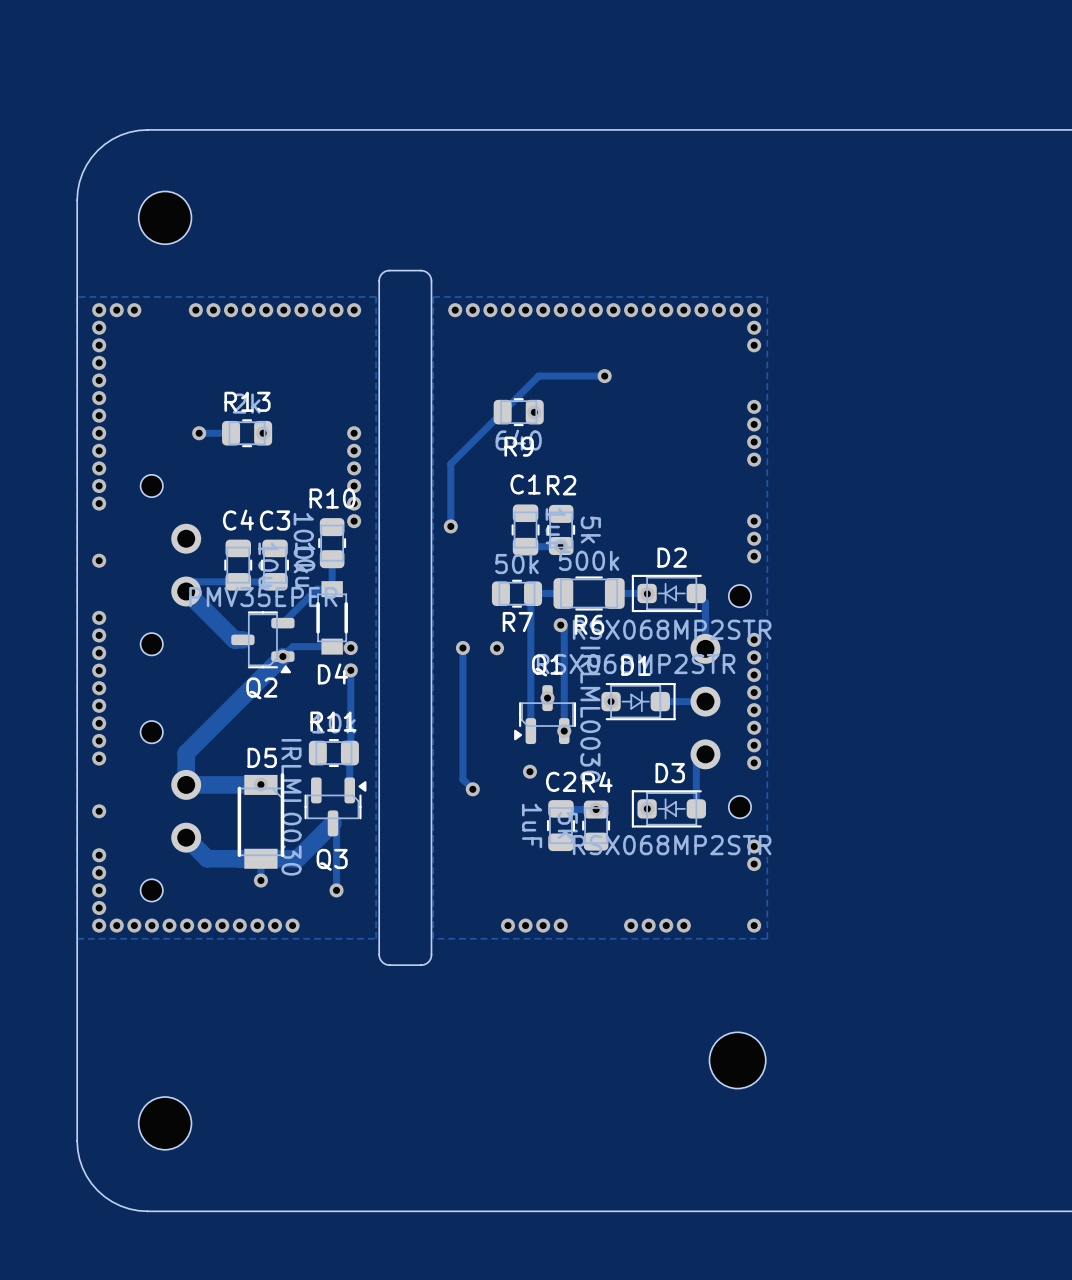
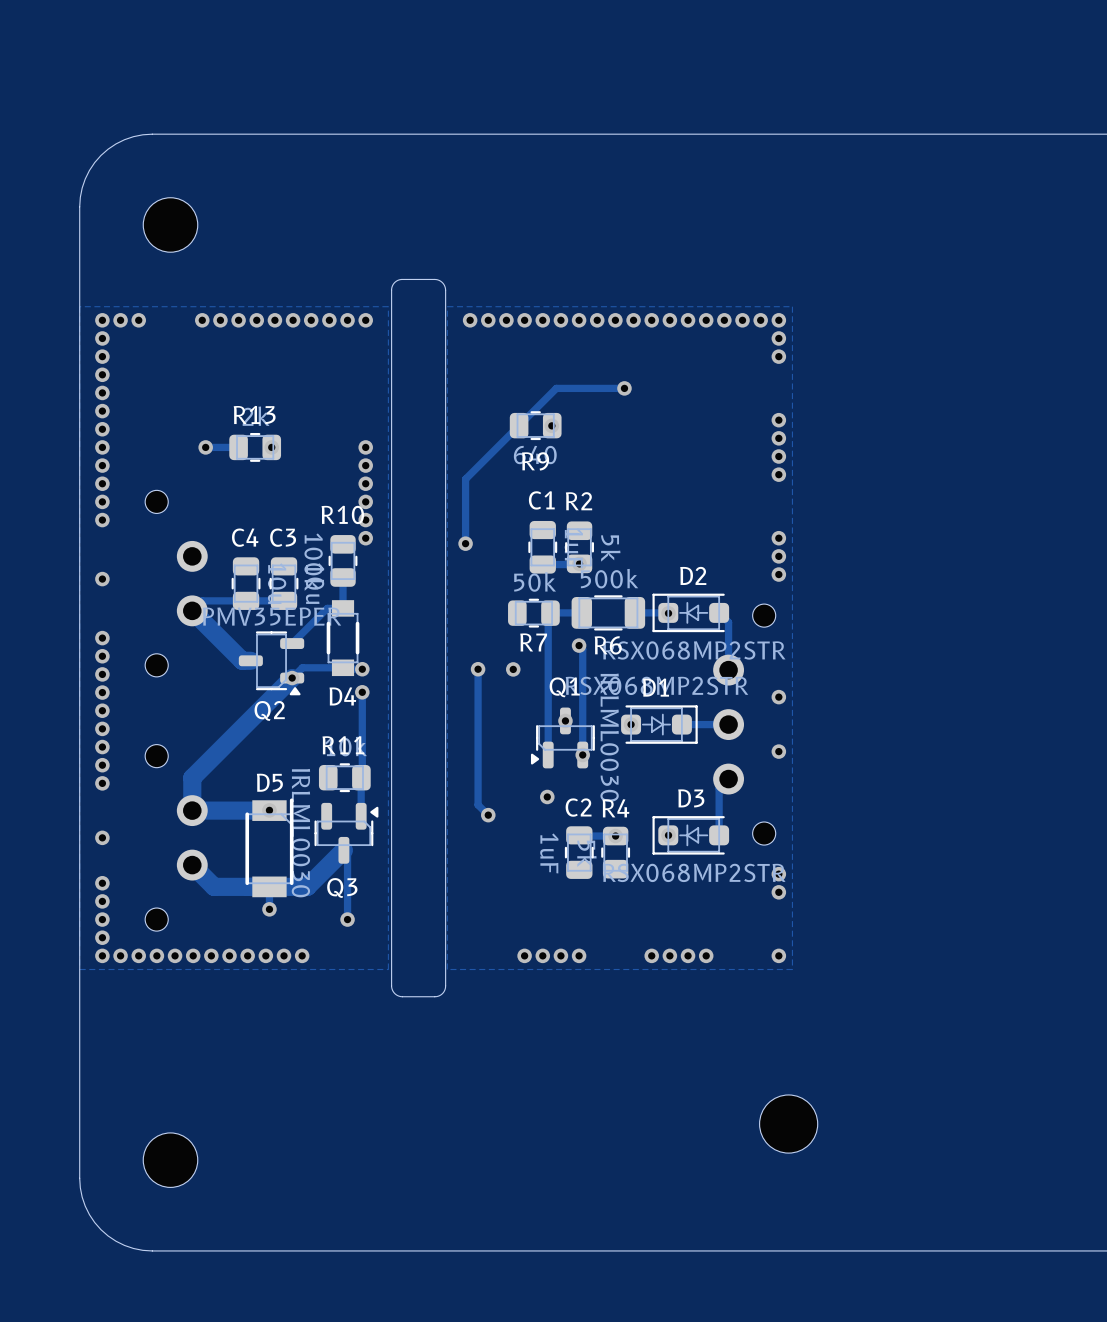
via: (754, 639) -> none
via: (754, 657) -> none
via: (754, 692) -> none
via: (754, 710) -> none
via: (754, 745) -> none
via: (754, 762) -> none
part position: (737, 1060) -> (788, 1124)

